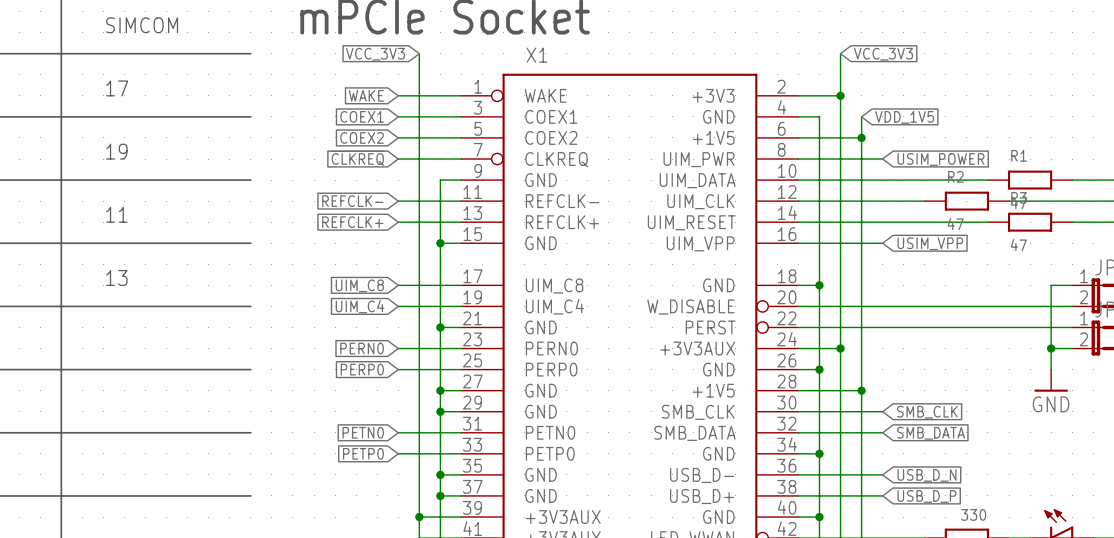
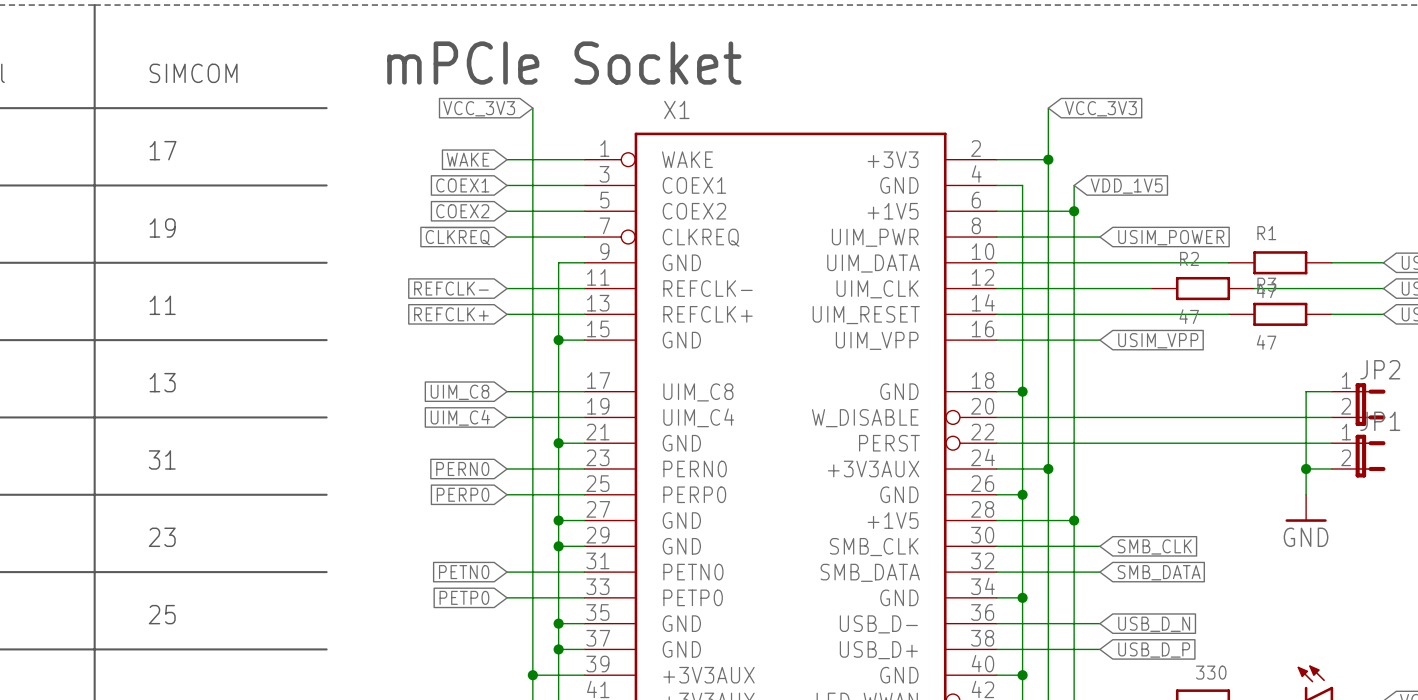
text: none -> 31 (162, 459)
text: none -> 23 (162, 537)
text: none -> 25 (162, 614)

